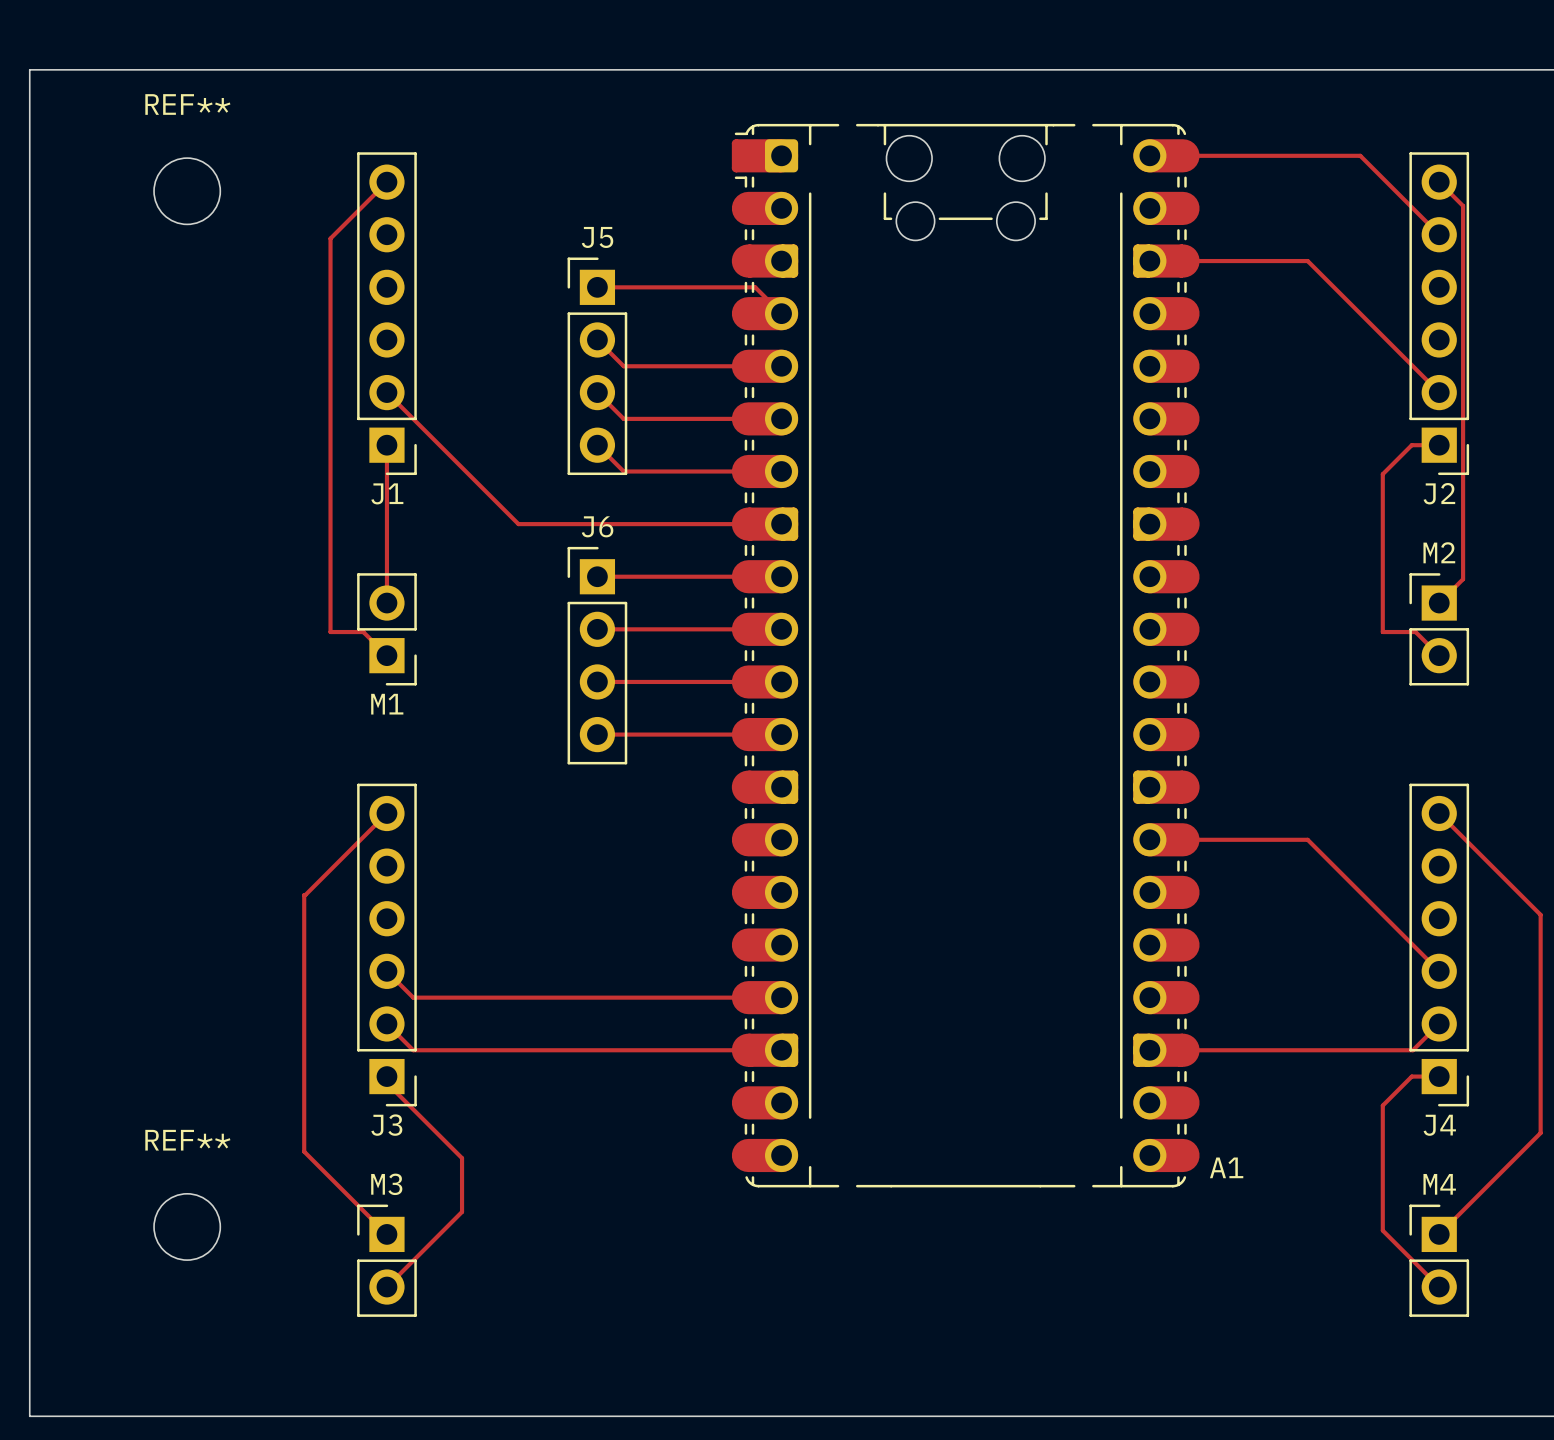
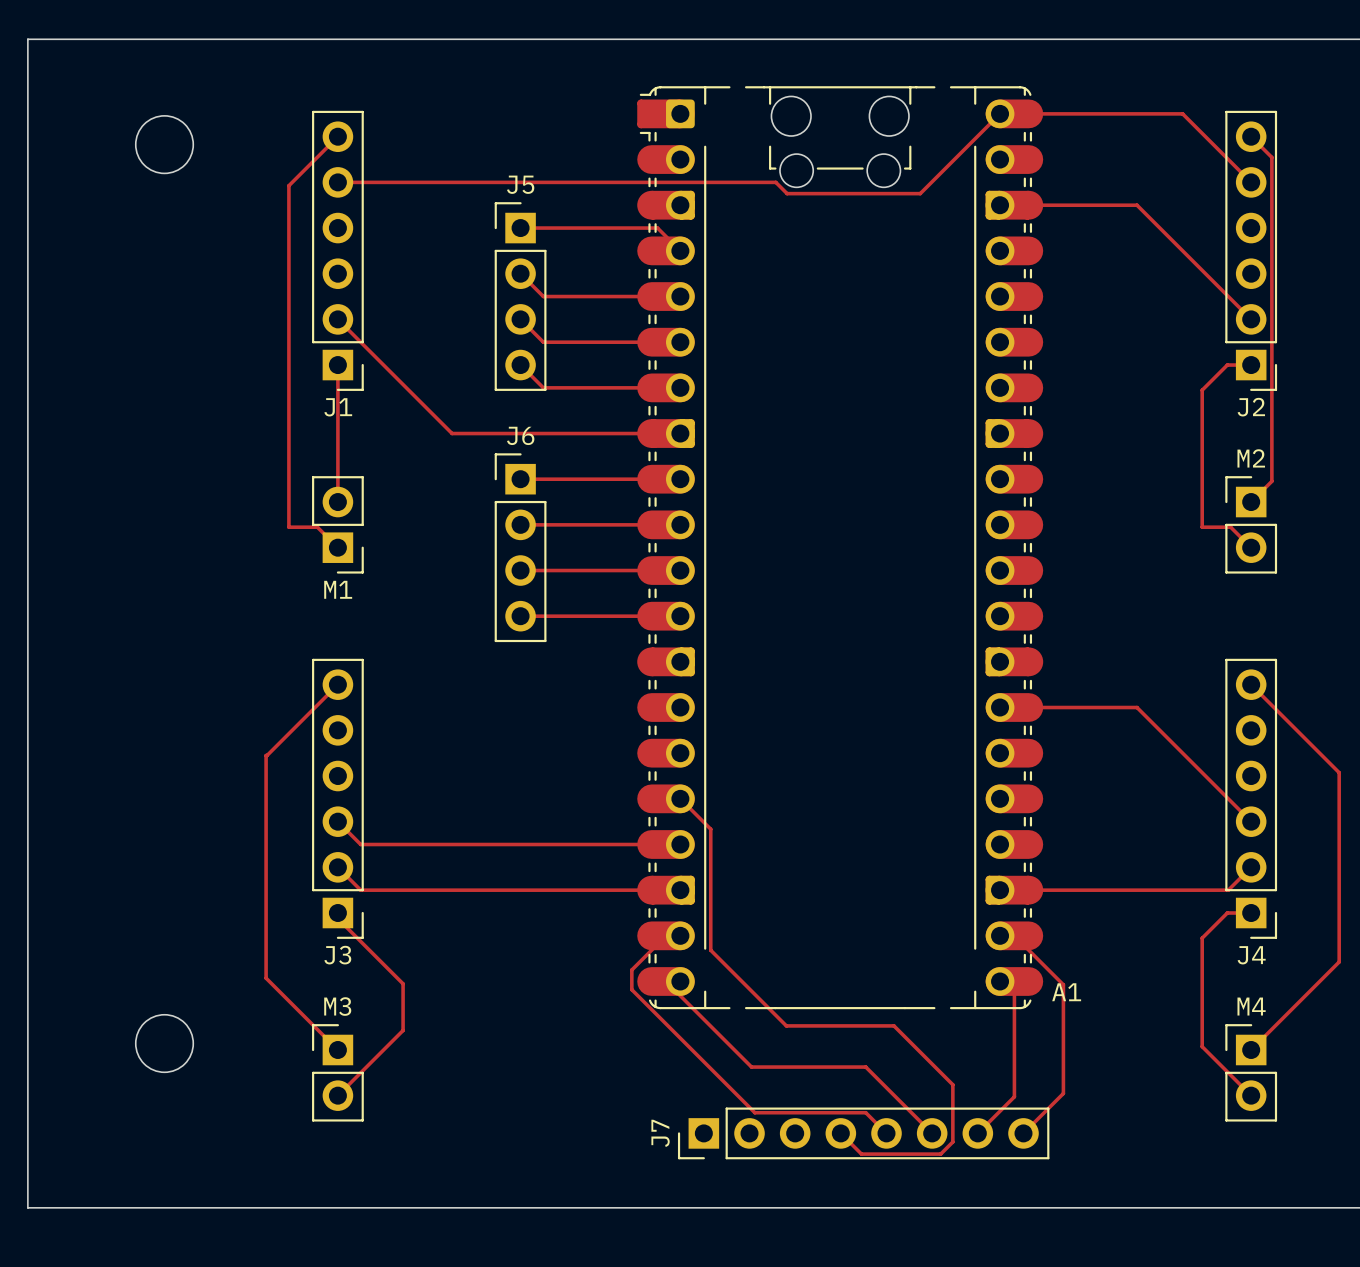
REF** name: REF** (187, 104) -> none
track: none -> (1000, 113) (920, 193) (787, 193) (775, 182) (337, 182)
track: none -> (680, 798) (710, 829) (710, 950) (786, 1025) (894, 1025) (952, 1084) (952, 1141) (940, 1154) (861, 1154) (840, 1133)
track: none -> (666, 935) (631, 970) (631, 989) (754, 1112) (865, 1112) (886, 1133)
track: none -> (1014, 935) (1063, 984) (1063, 1093) (1023, 1133)
REF** name: REF** (187, 1140) -> none
track: none -> (666, 981) (751, 1067) (865, 1067) (932, 1133)
track: none -> (1014, 981) (1014, 1096) (977, 1133)
J7: none -> (863, 1133)

